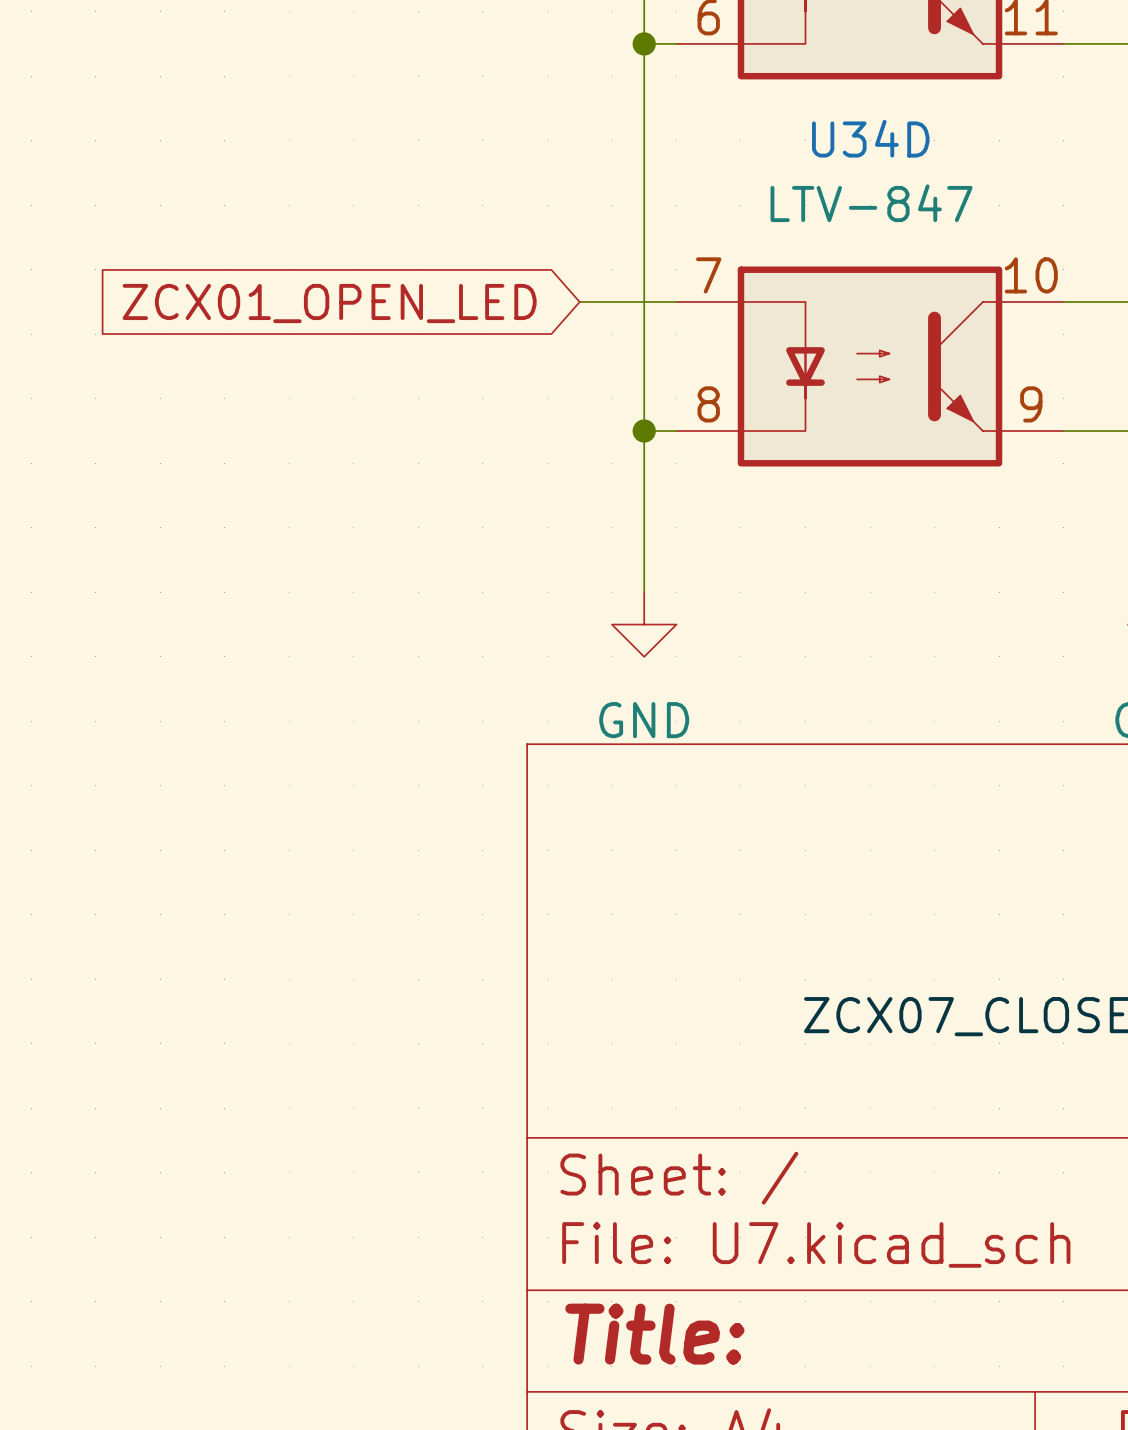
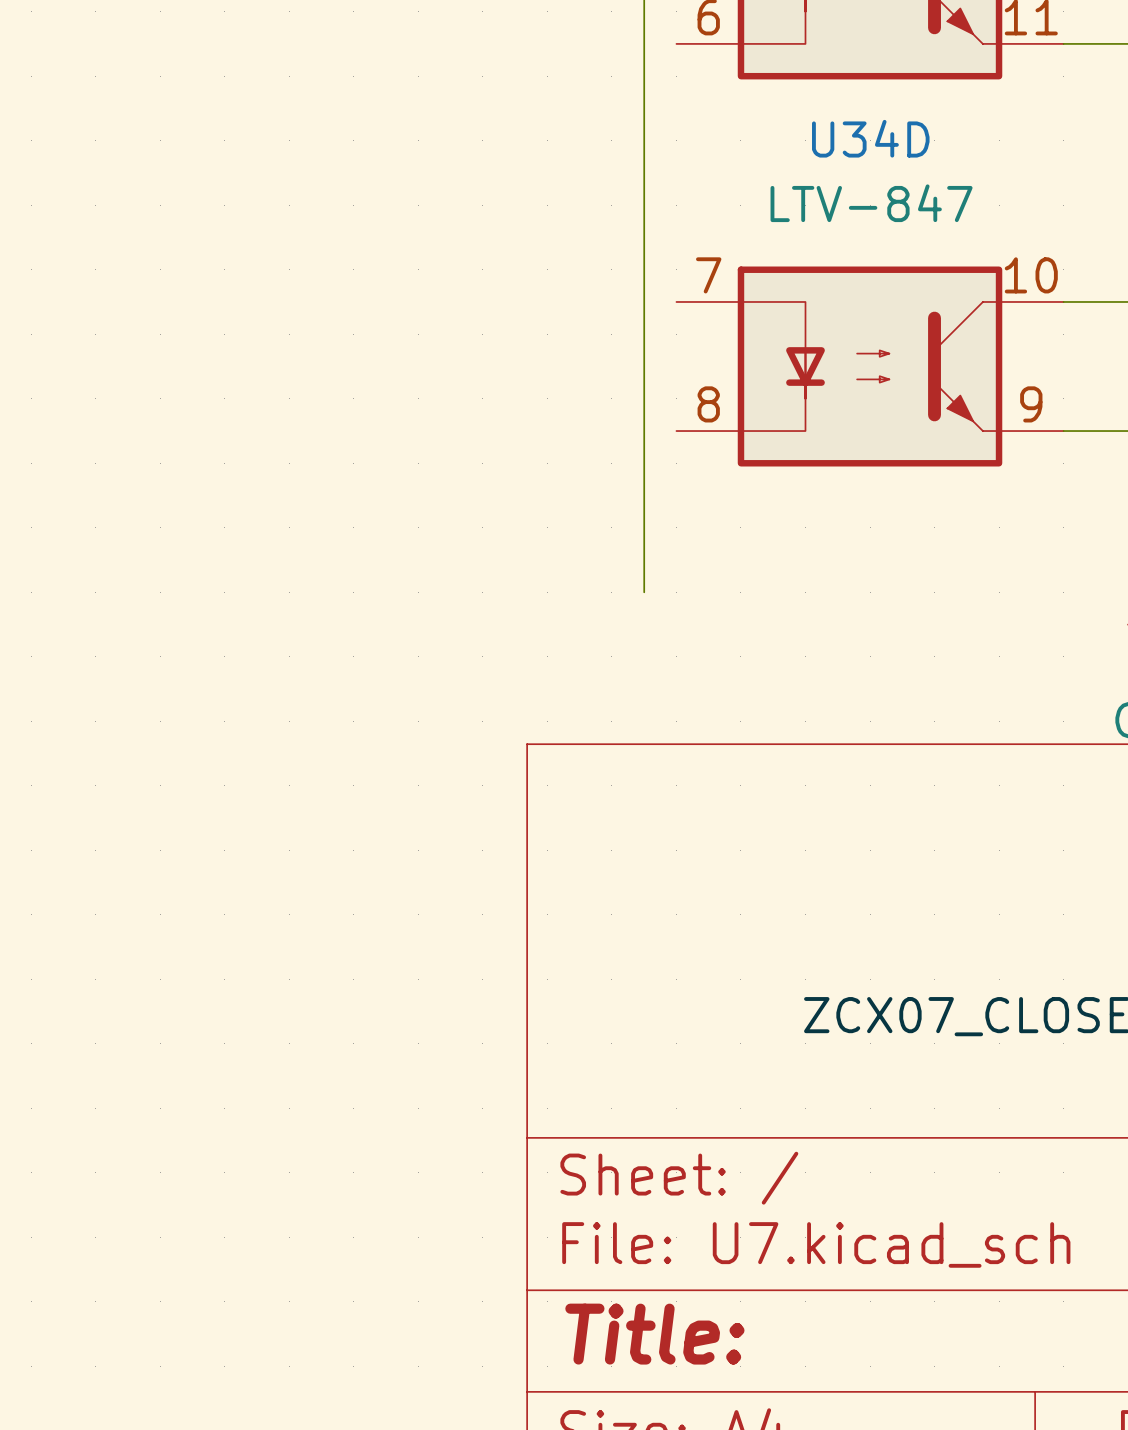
wire: (644, 43) (676, 43) -> none
junction: (644, 43) -> none
wire: (579, 301) (676, 301) -> none
global label: ZCX01_OPEN_LED (329, 303) -> none
wire: (644, 431) (676, 431) -> none
junction: (644, 431) -> none
power symbol: GND (644, 624) -> none

